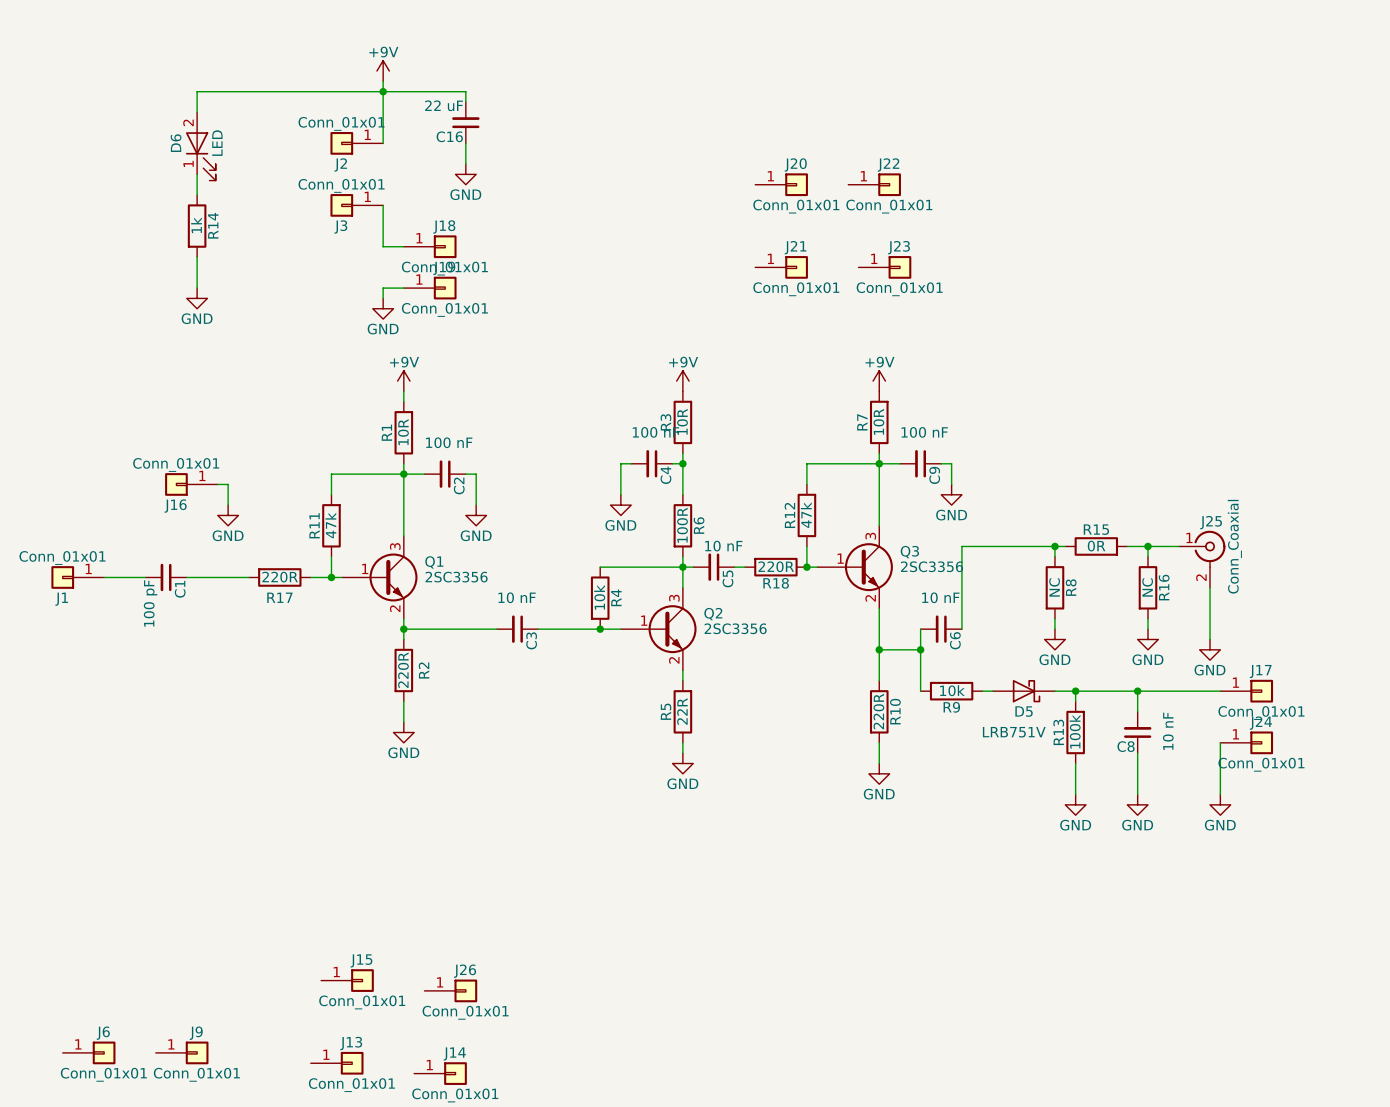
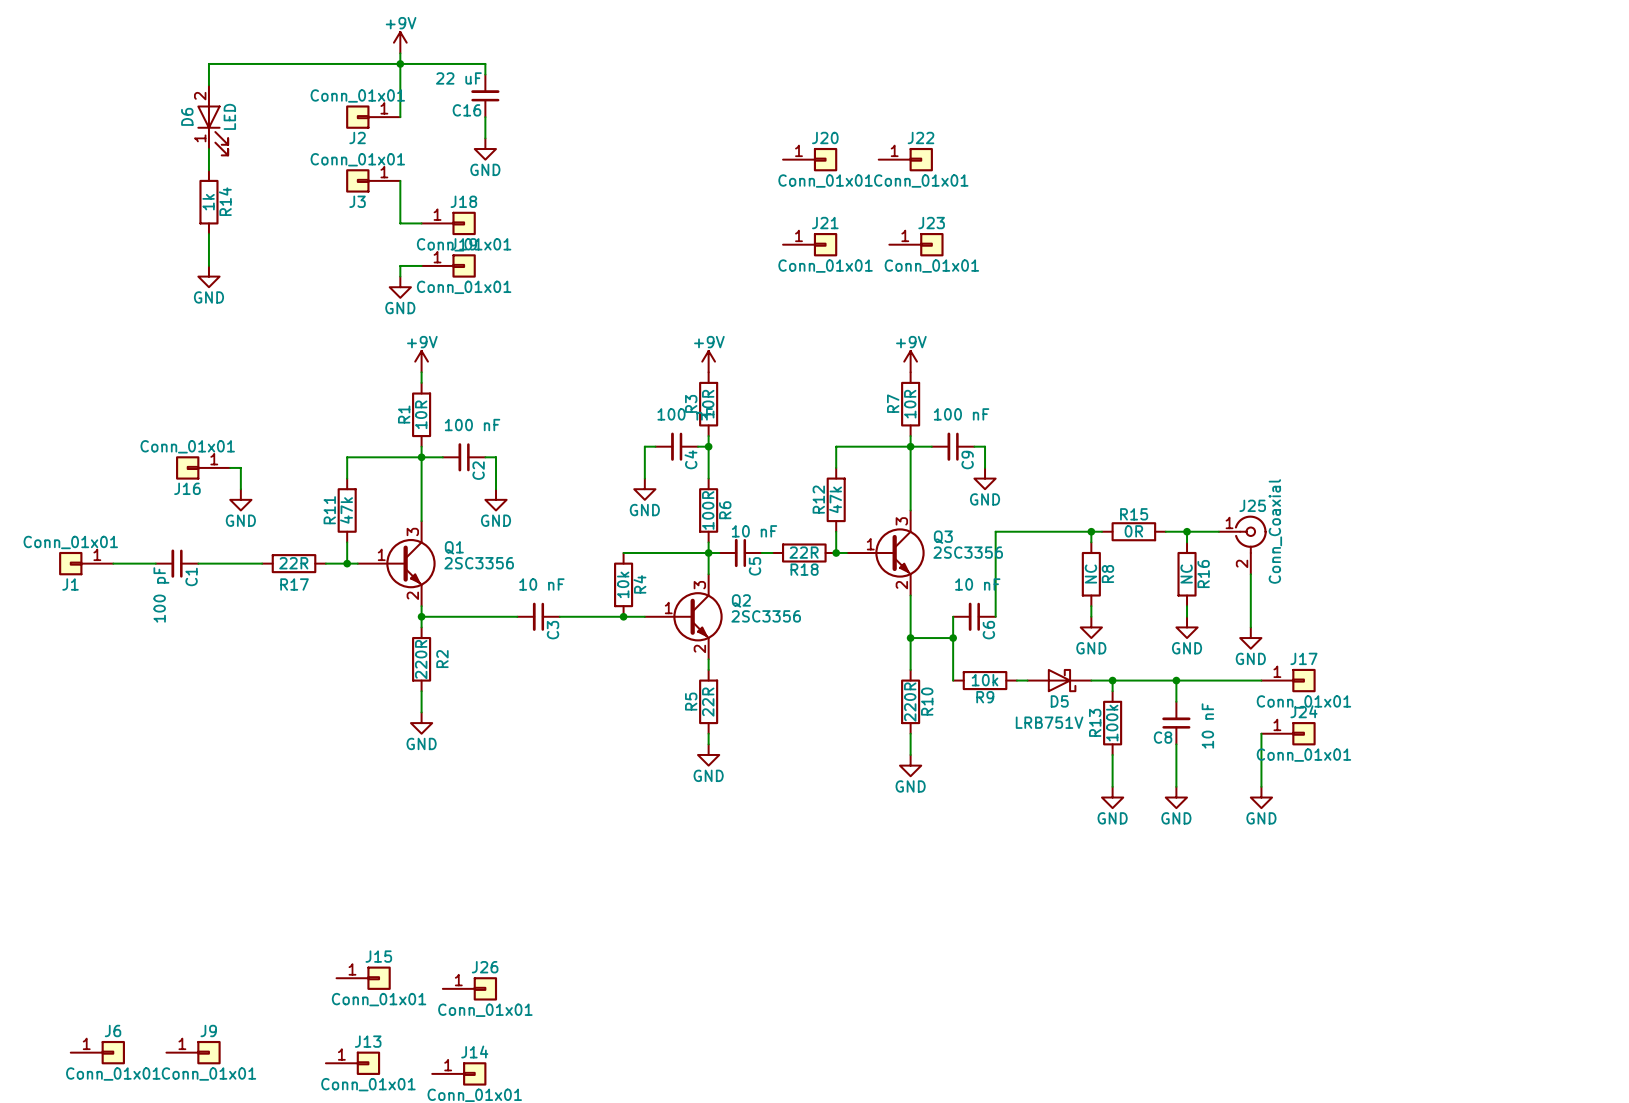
R18 value: 220R (776, 566) -> 22R (804, 552)
R17 value: 220R (280, 577) -> 22R (293, 563)

